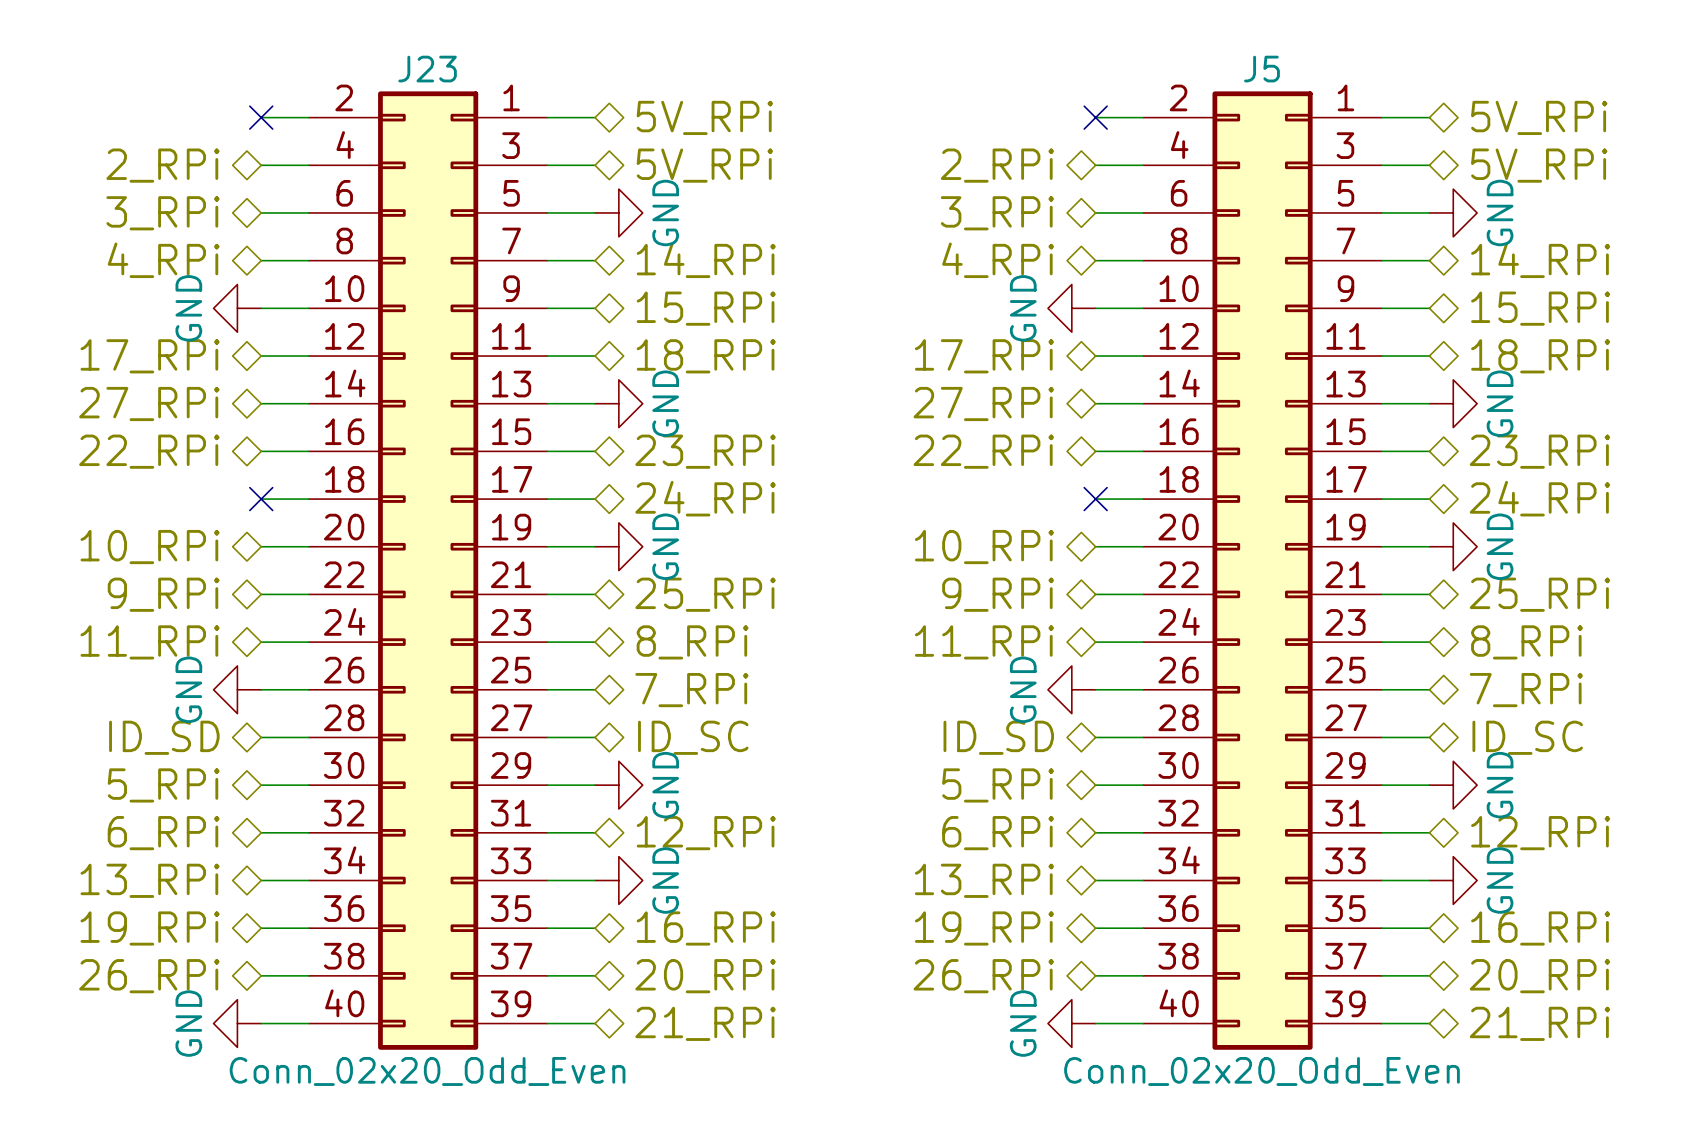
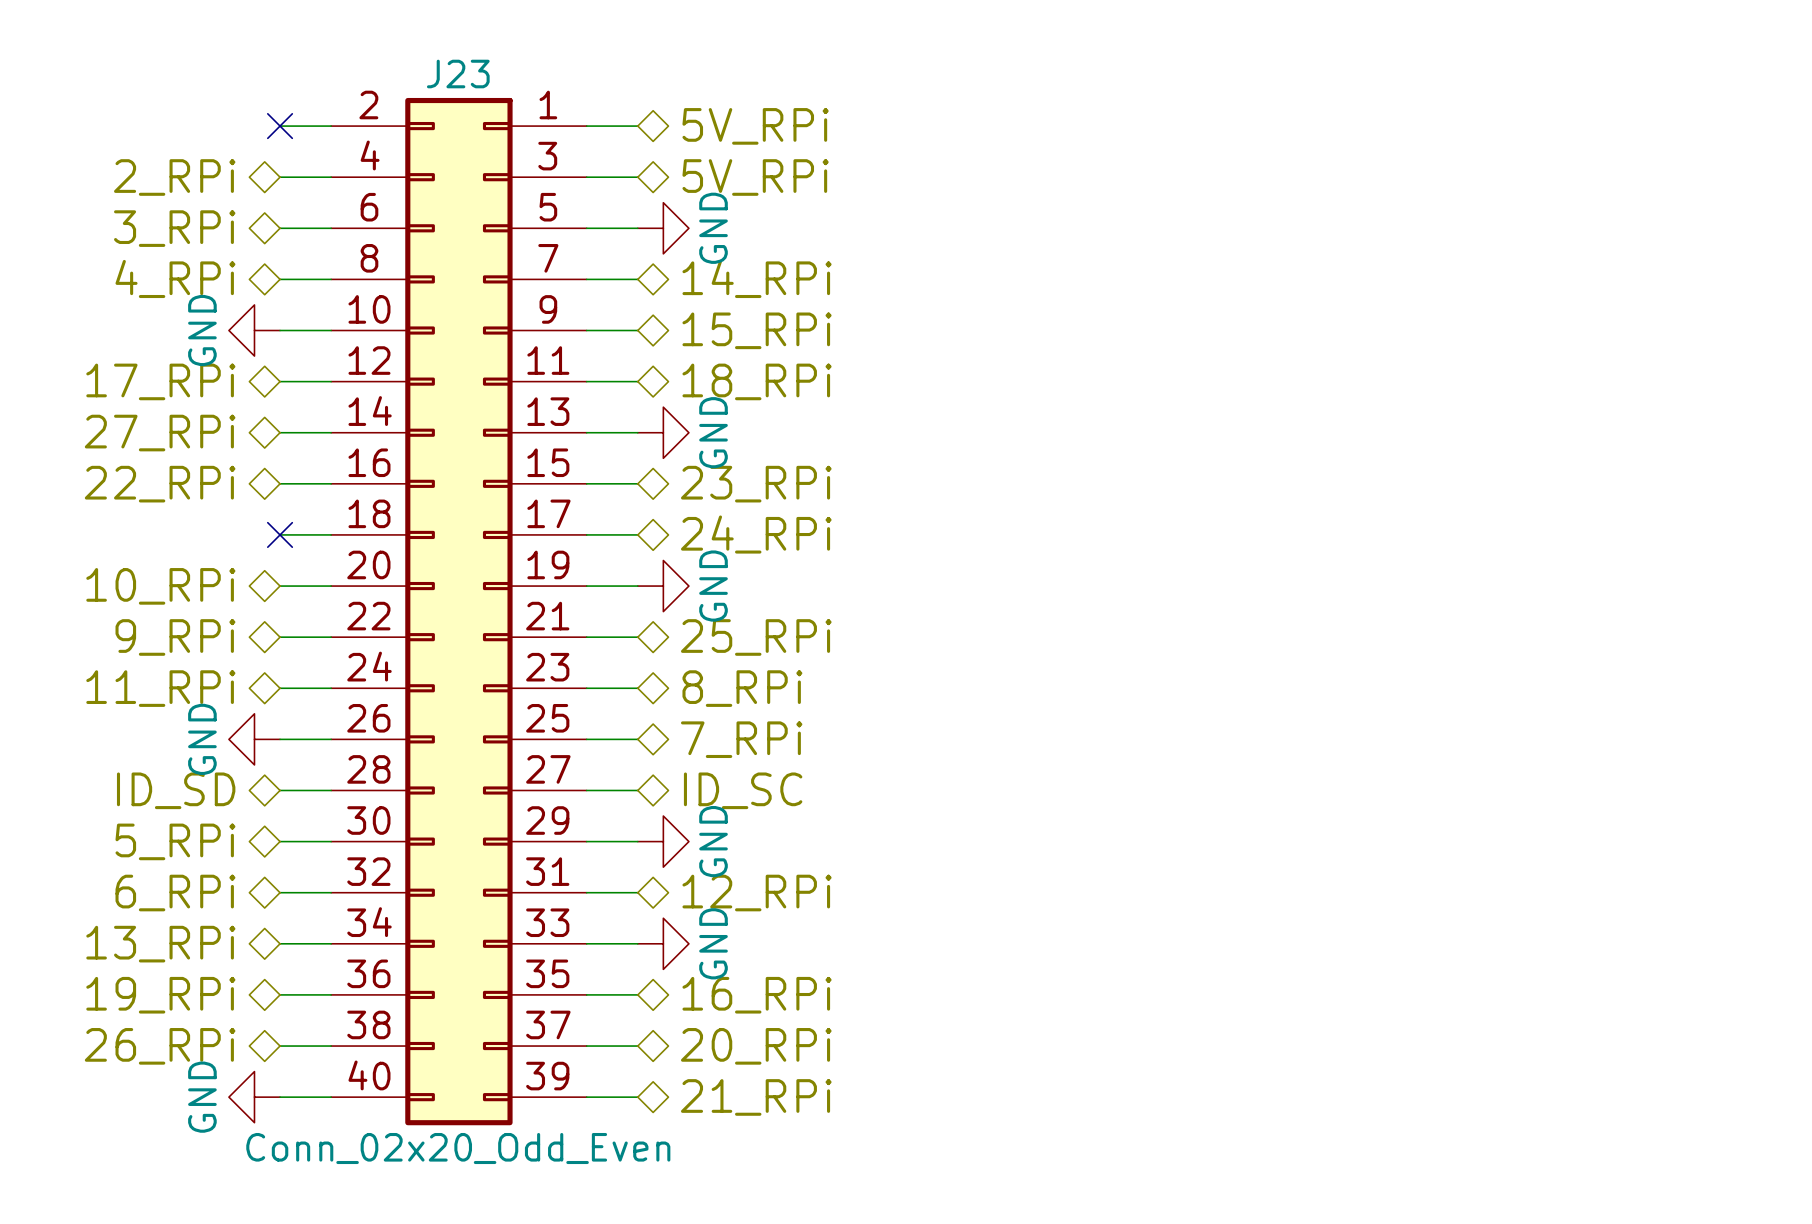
wire: (1095, 117) (1143, 117) -> none
no-connect mark: (1095, 117) -> none
wire: (1381, 117) (1429, 117) -> none
hierarchical label: 5V_RPi (1539, 117) -> none
hierarchical label: 2_RPi (997, 165) -> none
wire: (1095, 165) (1143, 165) -> none
wire: (1381, 165) (1429, 165) -> none
hierarchical label: 5V_RPi (1539, 165) -> none
wire: (1095, 212) (1143, 212) -> none
wire: (1381, 212) (1429, 212) -> none
power symbol: GND (1453, 212) -> none
hierarchical label: 3_RPi (997, 213) -> none
hierarchical label: 4_RPi (998, 260) -> none
wire: (1095, 260) (1143, 260) -> none
wire: (1381, 260) (1429, 260) -> none
hierarchical label: 14_RPi (1540, 260) -> none
power symbol: GND (1071, 308) -> none
wire: (1095, 308) (1143, 308) -> none
wire: (1381, 308) (1429, 308) -> none
hierarchical label: 15_RPi (1540, 308) -> none
hierarchical label: 17_RPi (984, 356) -> none
wire: (1095, 356) (1143, 356) -> none
wire: (1381, 356) (1429, 356) -> none
hierarchical label: 18_RPi (1540, 356) -> none
hierarchical label: 27_RPi (983, 403) -> none
wire: (1095, 403) (1143, 403) -> none
wire: (1381, 403) (1429, 403) -> none
power symbol: GND (1453, 403) -> none
hierarchical label: 22_RPi (983, 451) -> none
wire: (1095, 451) (1143, 451) -> none
wire: (1381, 451) (1429, 451) -> none
hierarchical label: 23_RPi (1539, 451) -> none
hierarchical label: 24_RPi (1539, 498) -> none
wire: (1095, 499) (1143, 499) -> none
no-connect mark: (1095, 499) -> none
wire: (1381, 499) (1429, 499) -> none
wire: (1095, 546) (1143, 546) -> none
wire: (1381, 546) (1429, 546) -> none
power symbol: GND (1453, 546) -> none
hierarchical label: 10_RPi (984, 547) -> none
J5: Conn_02x20_Odd_Even (1262, 570) -> none
hierarchical label: 9_RPi (998, 594) -> none
wire: (1095, 594) (1143, 594) -> none
wire: (1381, 594) (1429, 594) -> none
hierarchical label: 25_RPi (1539, 594) -> none
hierarchical label: 11_RPi (984, 642) -> none
wire: (1095, 642) (1143, 642) -> none
wire: (1381, 642) (1429, 642) -> none
hierarchical label: 8_RPi (1527, 642) -> none
power symbol: GND (1071, 689) -> none
wire: (1095, 689) (1143, 689) -> none
wire: (1381, 689) (1429, 689) -> none
hierarchical label: 7_RPi (1526, 690) -> none
hierarchical label: ID_SD (998, 737) -> none
wire: (1095, 737) (1143, 737) -> none
wire: (1381, 737) (1429, 737) -> none
hierarchical label: ID_SC (1527, 737) -> none
hierarchical label: 5_RPi (998, 785) -> none
wire: (1095, 785) (1143, 785) -> none
wire: (1381, 785) (1429, 785) -> none
power symbol: GND (1453, 785) -> none
wire: (1095, 832) (1143, 832) -> none
wire: (1381, 832) (1429, 832) -> none
hierarchical label: 6_RPi (998, 833) -> none
hierarchical label: 12_RPi (1540, 833) -> none
hierarchical label: 13_RPi (984, 880) -> none
wire: (1095, 880) (1143, 880) -> none
wire: (1381, 880) (1429, 880) -> none
power symbol: GND (1453, 880) -> none
hierarchical label: 19_RPi (984, 928) -> none
wire: (1095, 928) (1143, 928) -> none
wire: (1381, 928) (1429, 928) -> none
hierarchical label: 16_RPi (1540, 928) -> none
wire: (1095, 975) (1143, 975) -> none
wire: (1381, 975) (1429, 975) -> none
hierarchical label: 26_RPi (983, 976) -> none
hierarchical label: 20_RPi (1539, 976) -> none
power symbol: GND (1071, 1023) -> none
wire: (1095, 1023) (1143, 1023) -> none
wire: (1381, 1023) (1429, 1023) -> none
hierarchical label: 21_RPi (1539, 1023) -> none

